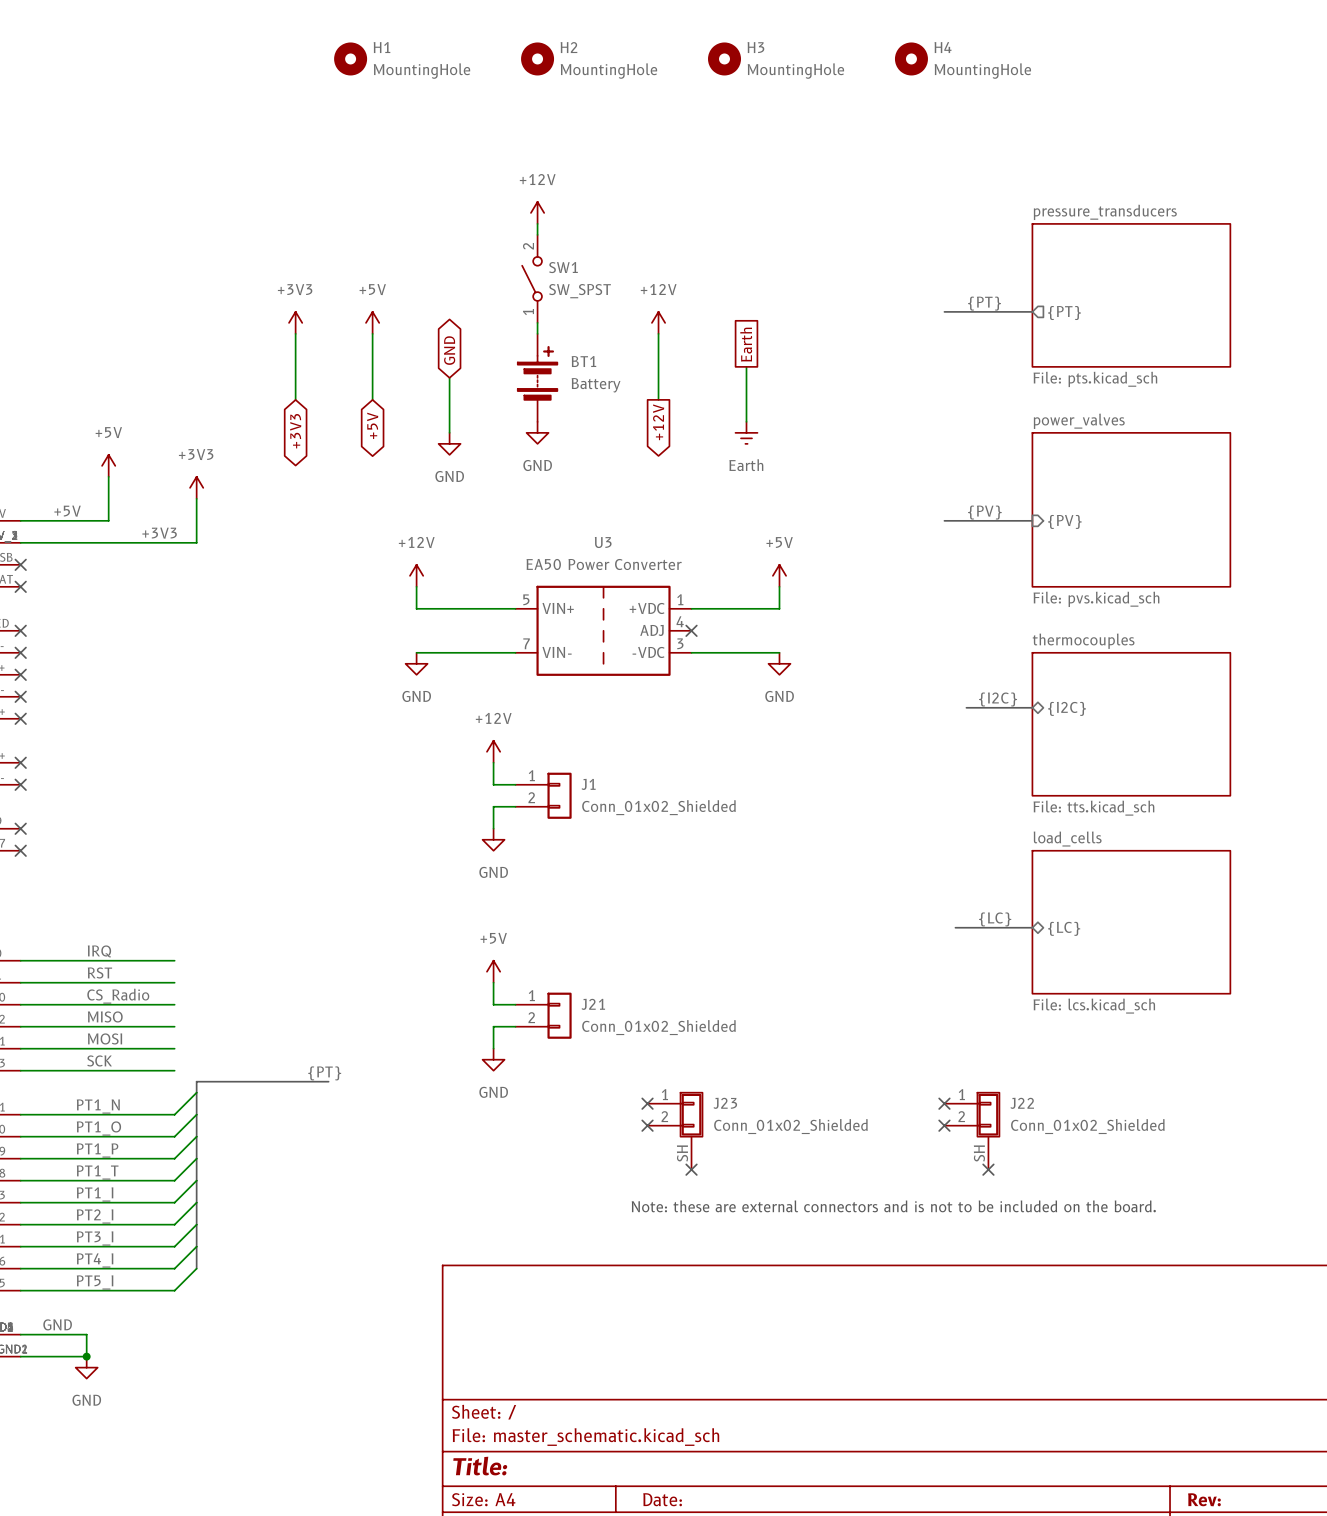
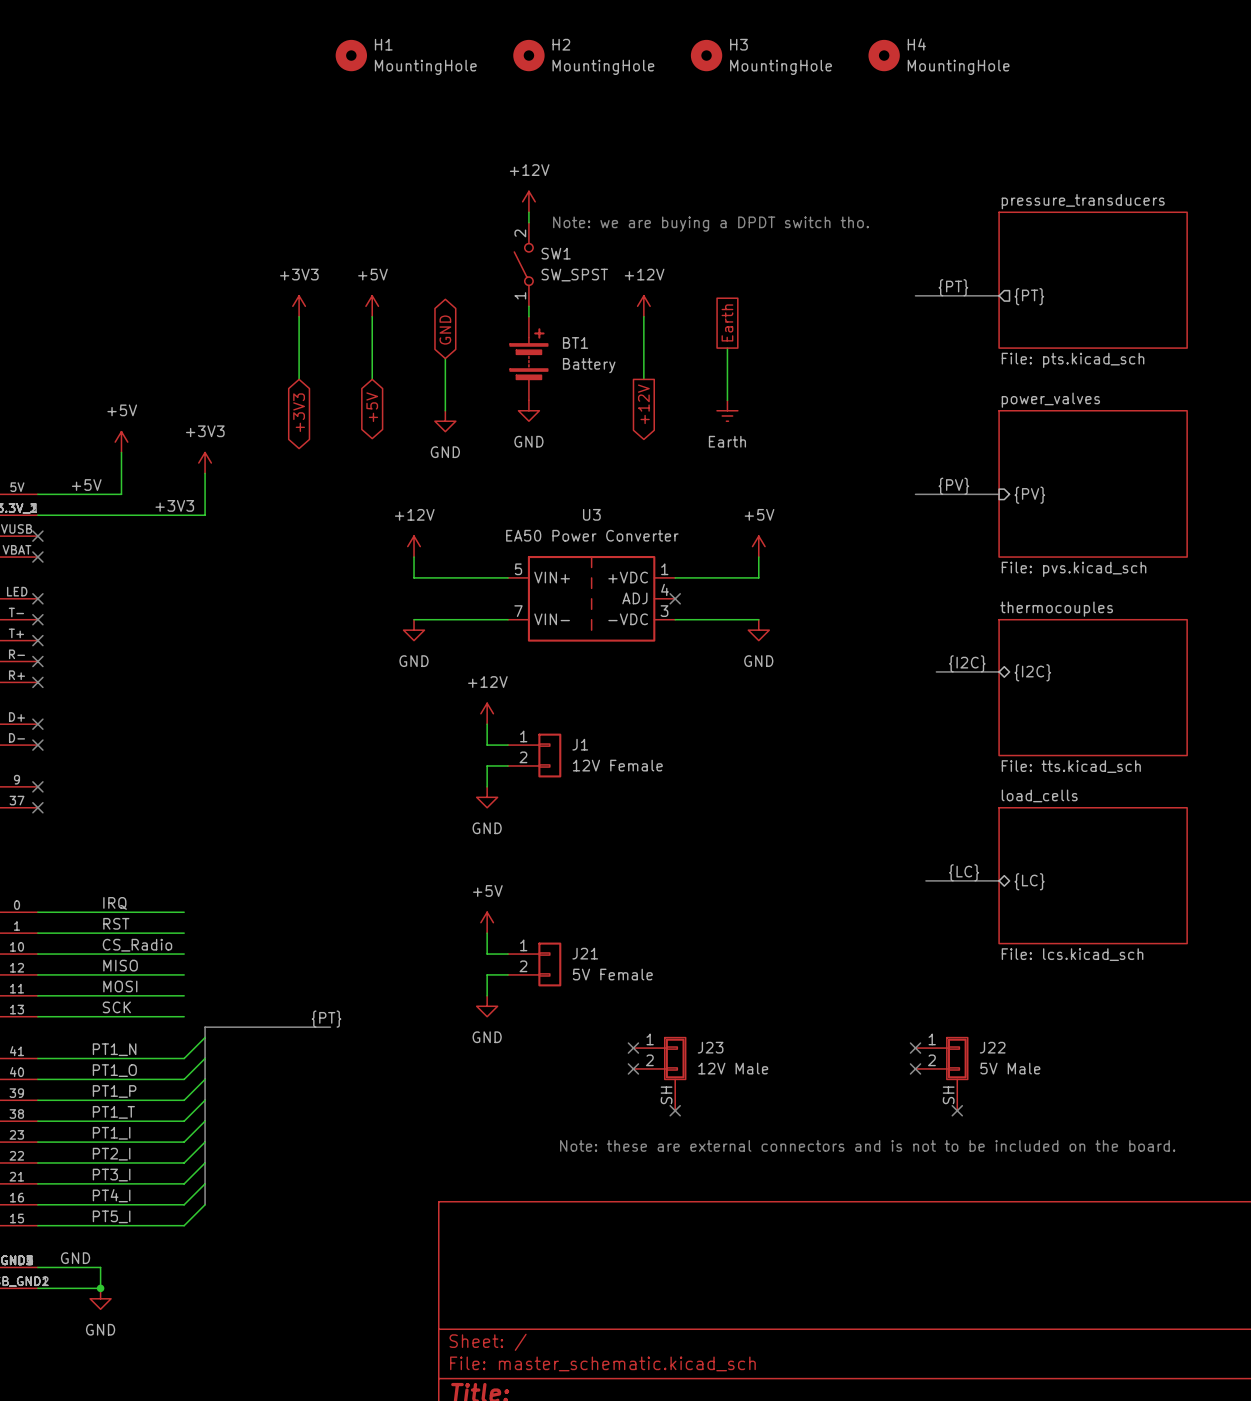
text: none -> Note: we are buying a DPDT switch tho. (710, 224)
J1 value: Conn_01x02_Shielded (658, 807) -> 12V Female (617, 765)
J21 value: Conn_01x02_Shielded (658, 1027) -> 5V Female (612, 974)
J23 value: Conn_01x02_Shielded (790, 1126) -> 12V Male (733, 1068)
J22 value: Conn_01x02_Shielded (1087, 1126) -> 5V Male (1010, 1068)

